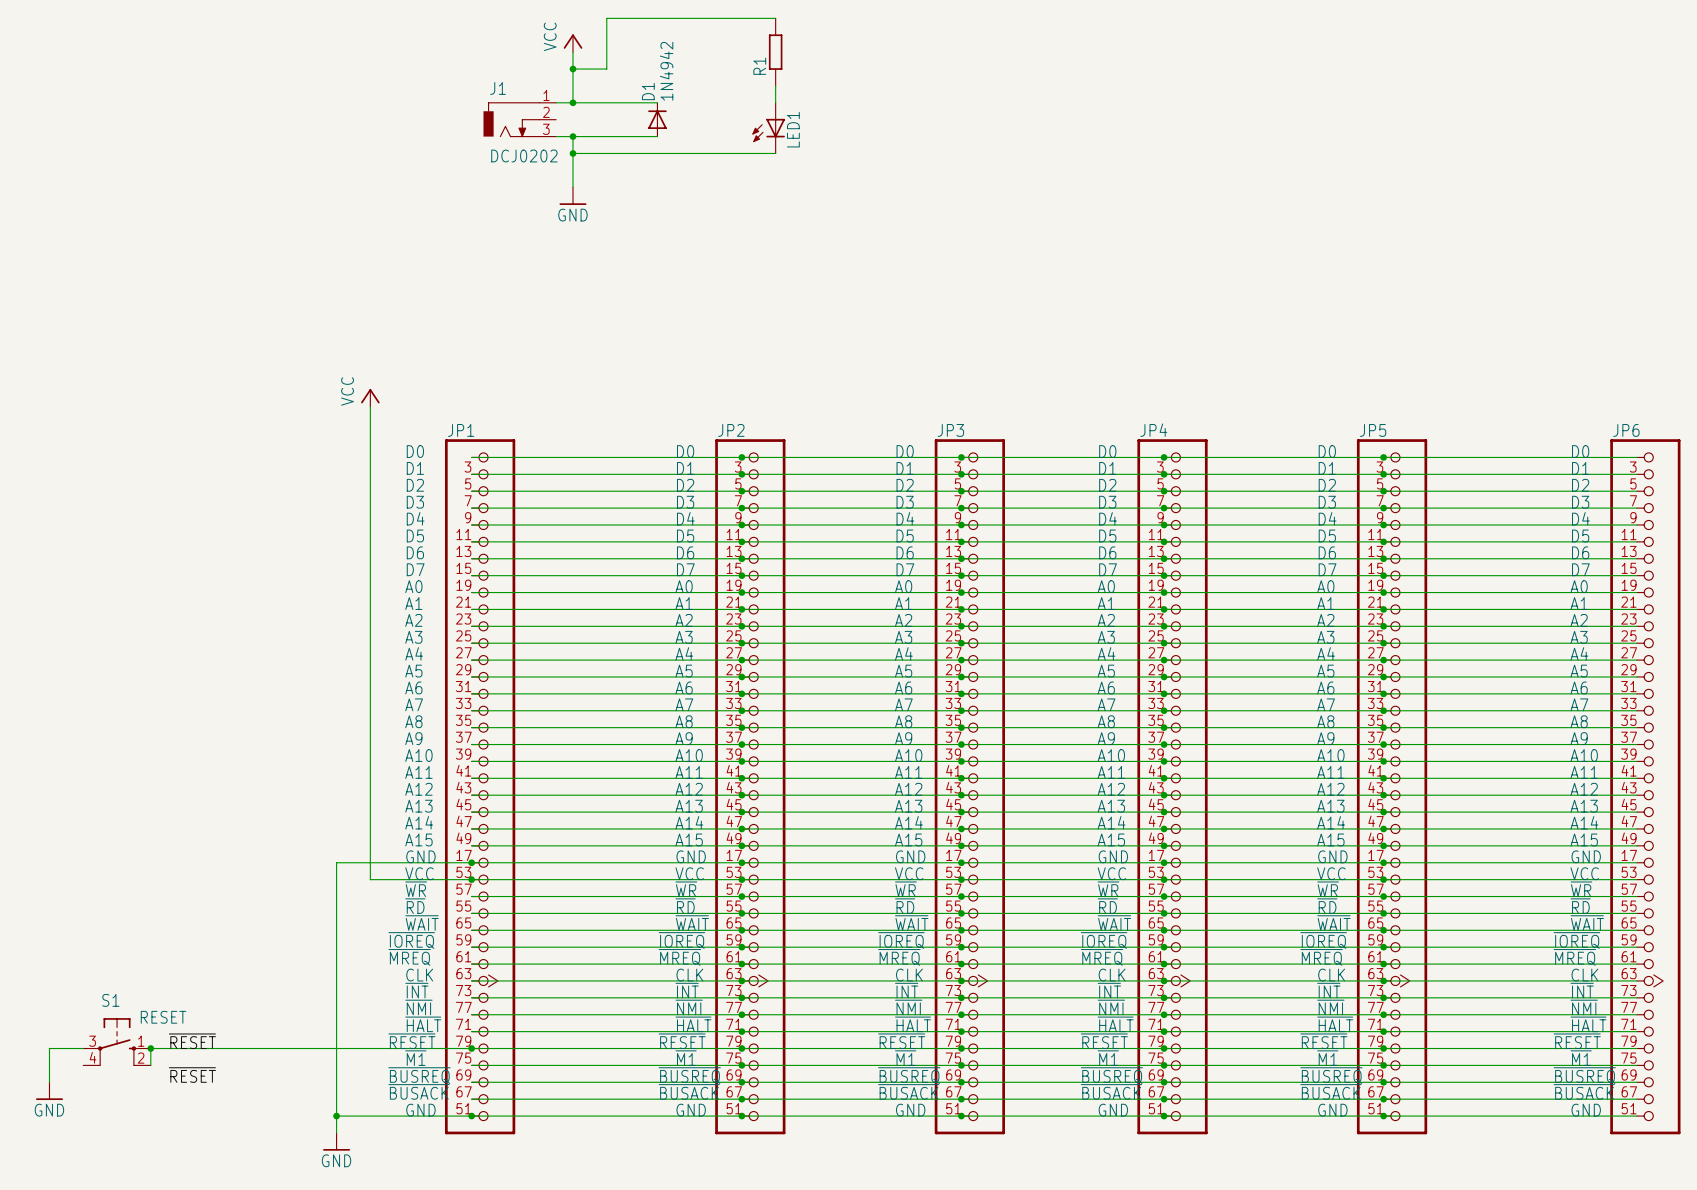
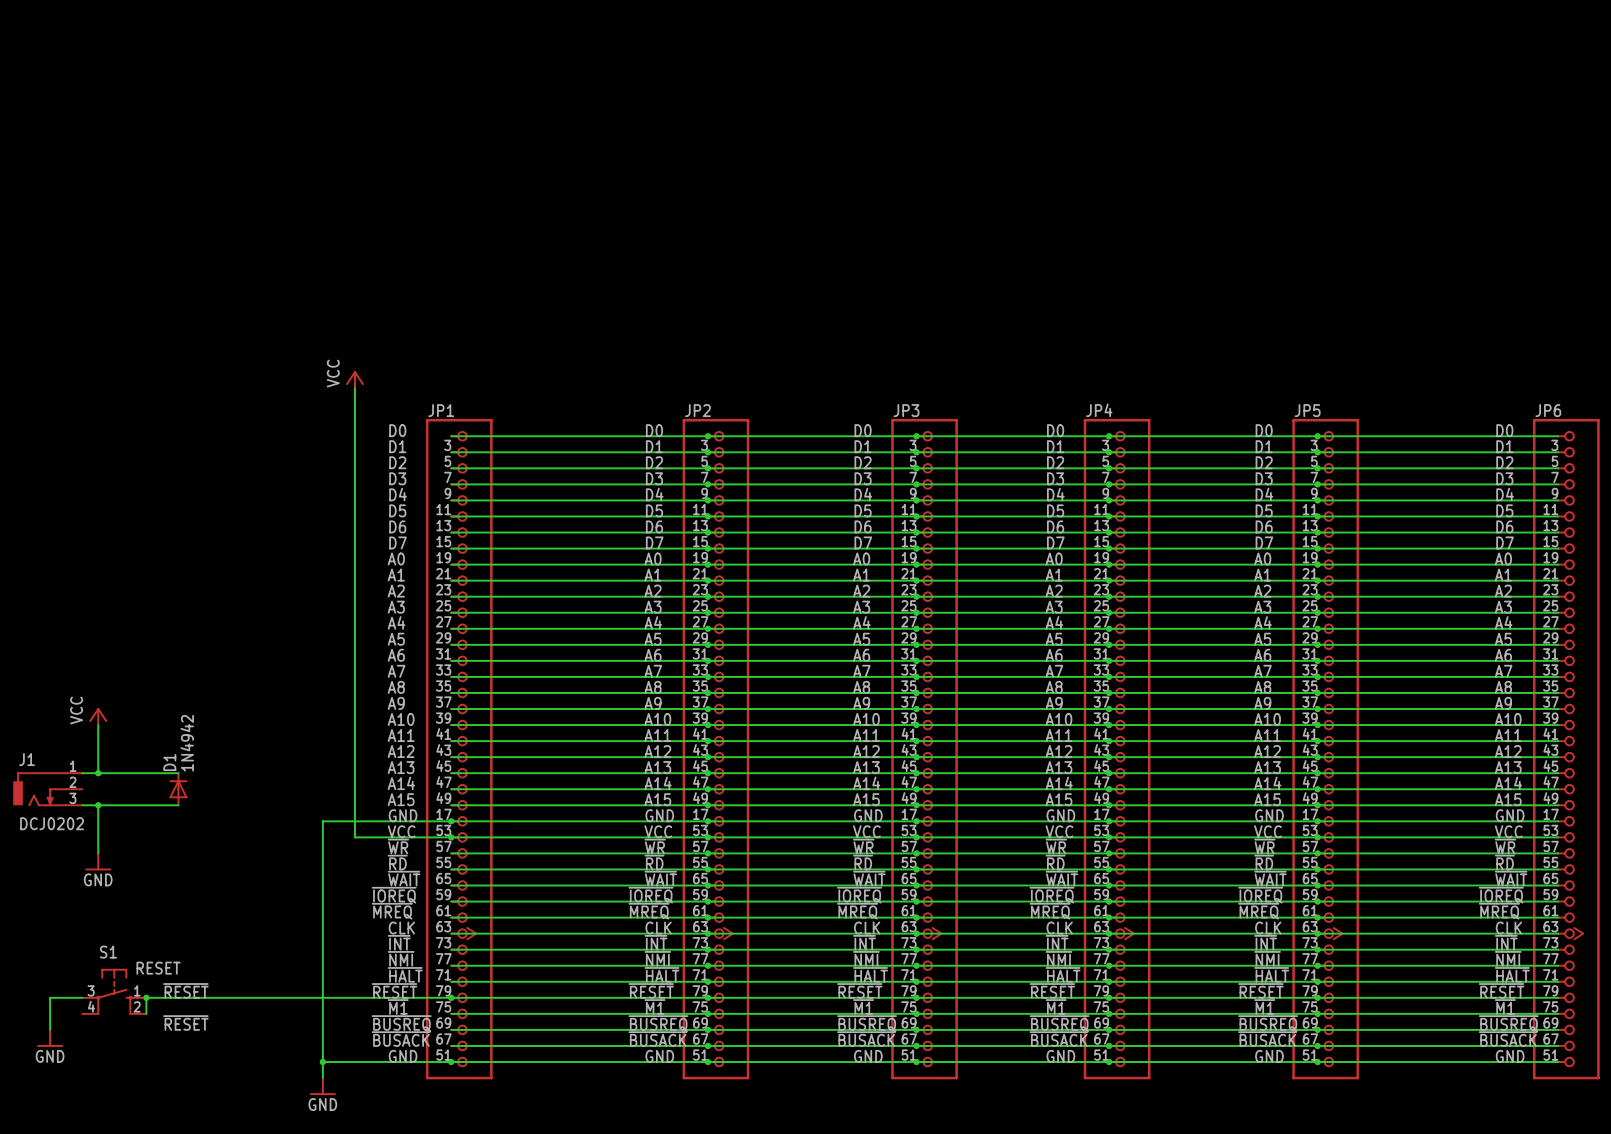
wire: (775, 18) (606, 18) (606, 69) (573, 69) -> none
power symbol: VCC (573, 43) -> none
wire: (573, 52) (573, 102) -> none
R1: (775, 52) -> none
junction: (573, 69) -> none
wire: (775, 85) (775, 102) -> none
wire: (556, 102) (657, 102) -> none
junction: (573, 102) -> none
J1 position: (519, 119) -> (47, 789)
D1 position: (657, 119) -> (178, 789)
LED1: (768, 128) -> none
wire: (556, 136) (657, 136) -> none
wire: (573, 136) (573, 187) -> none
junction: (573, 136) -> none
wire: (573, 153) (775, 153) -> none
junction: (573, 153) -> none
power symbol: GND (573, 196) -> none
power symbol: none -> VCC (98, 716)
wire: none -> (98, 725) (98, 773)
wire: none -> (82, 773) (178, 773)
junction: none -> (98, 773)
wire: none -> (82, 805) (178, 805)
wire: none -> (98, 805) (98, 853)
junction: none -> (98, 805)
power symbol: none -> GND (98, 861)

